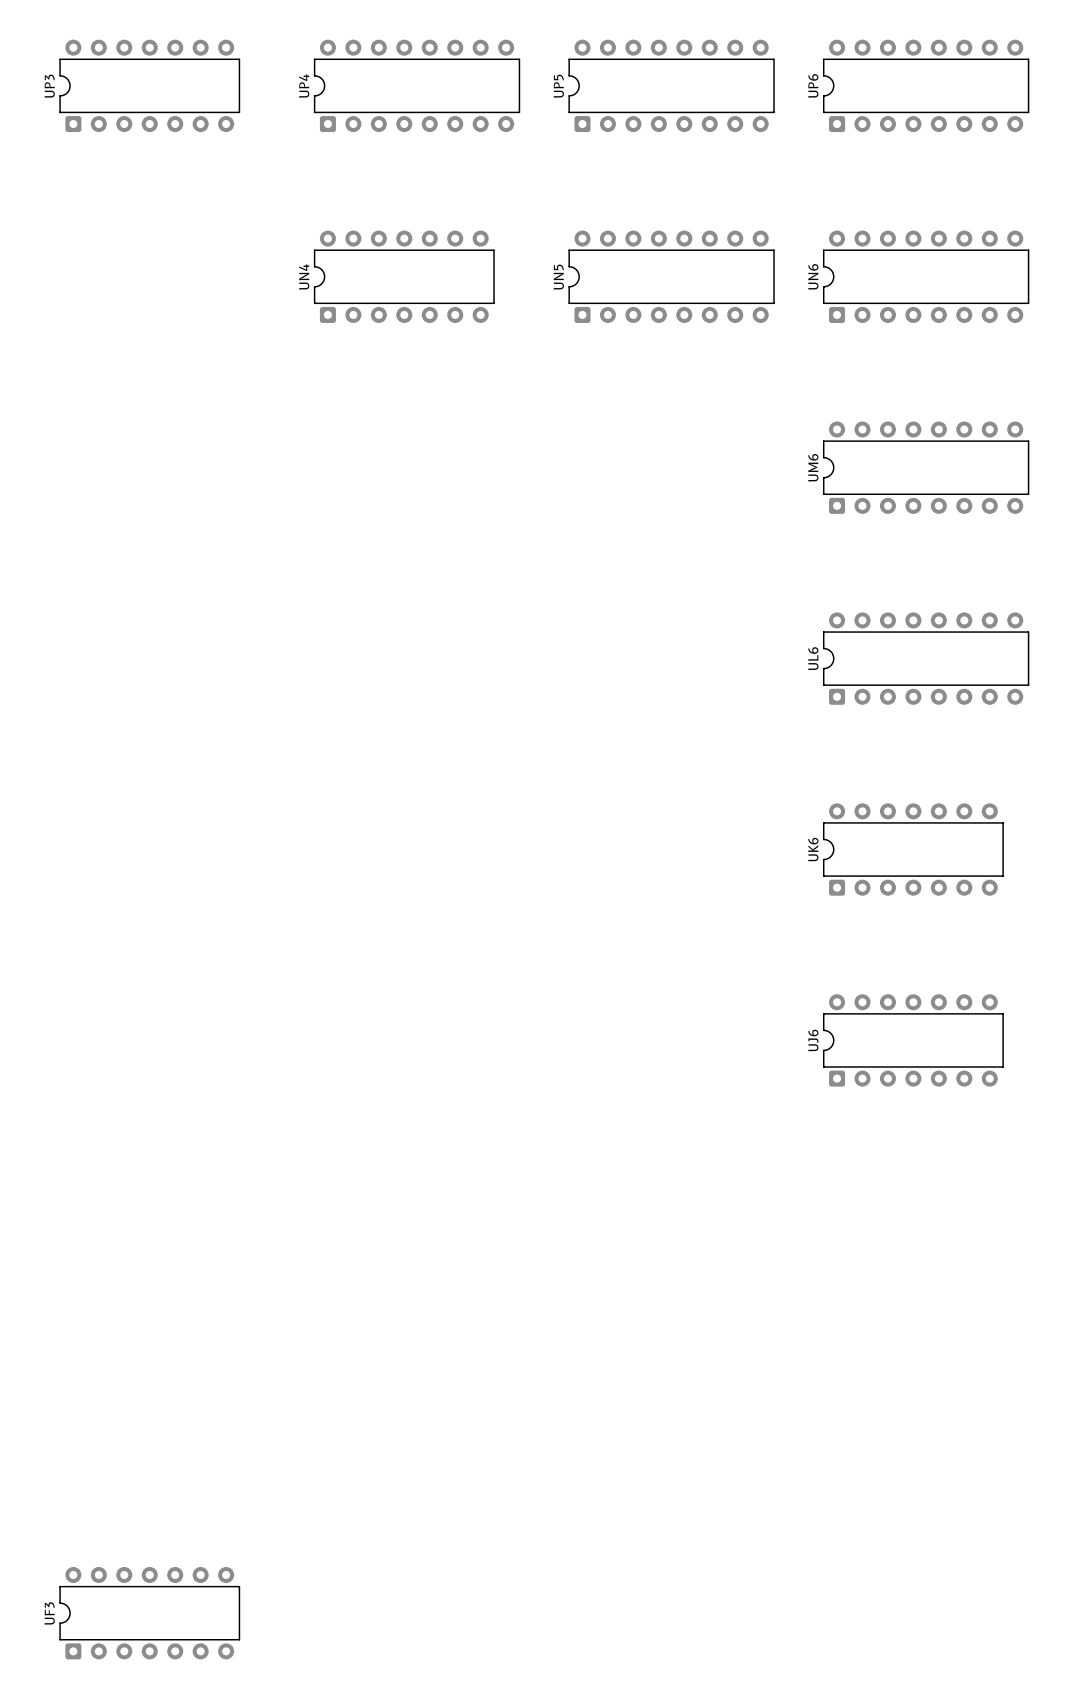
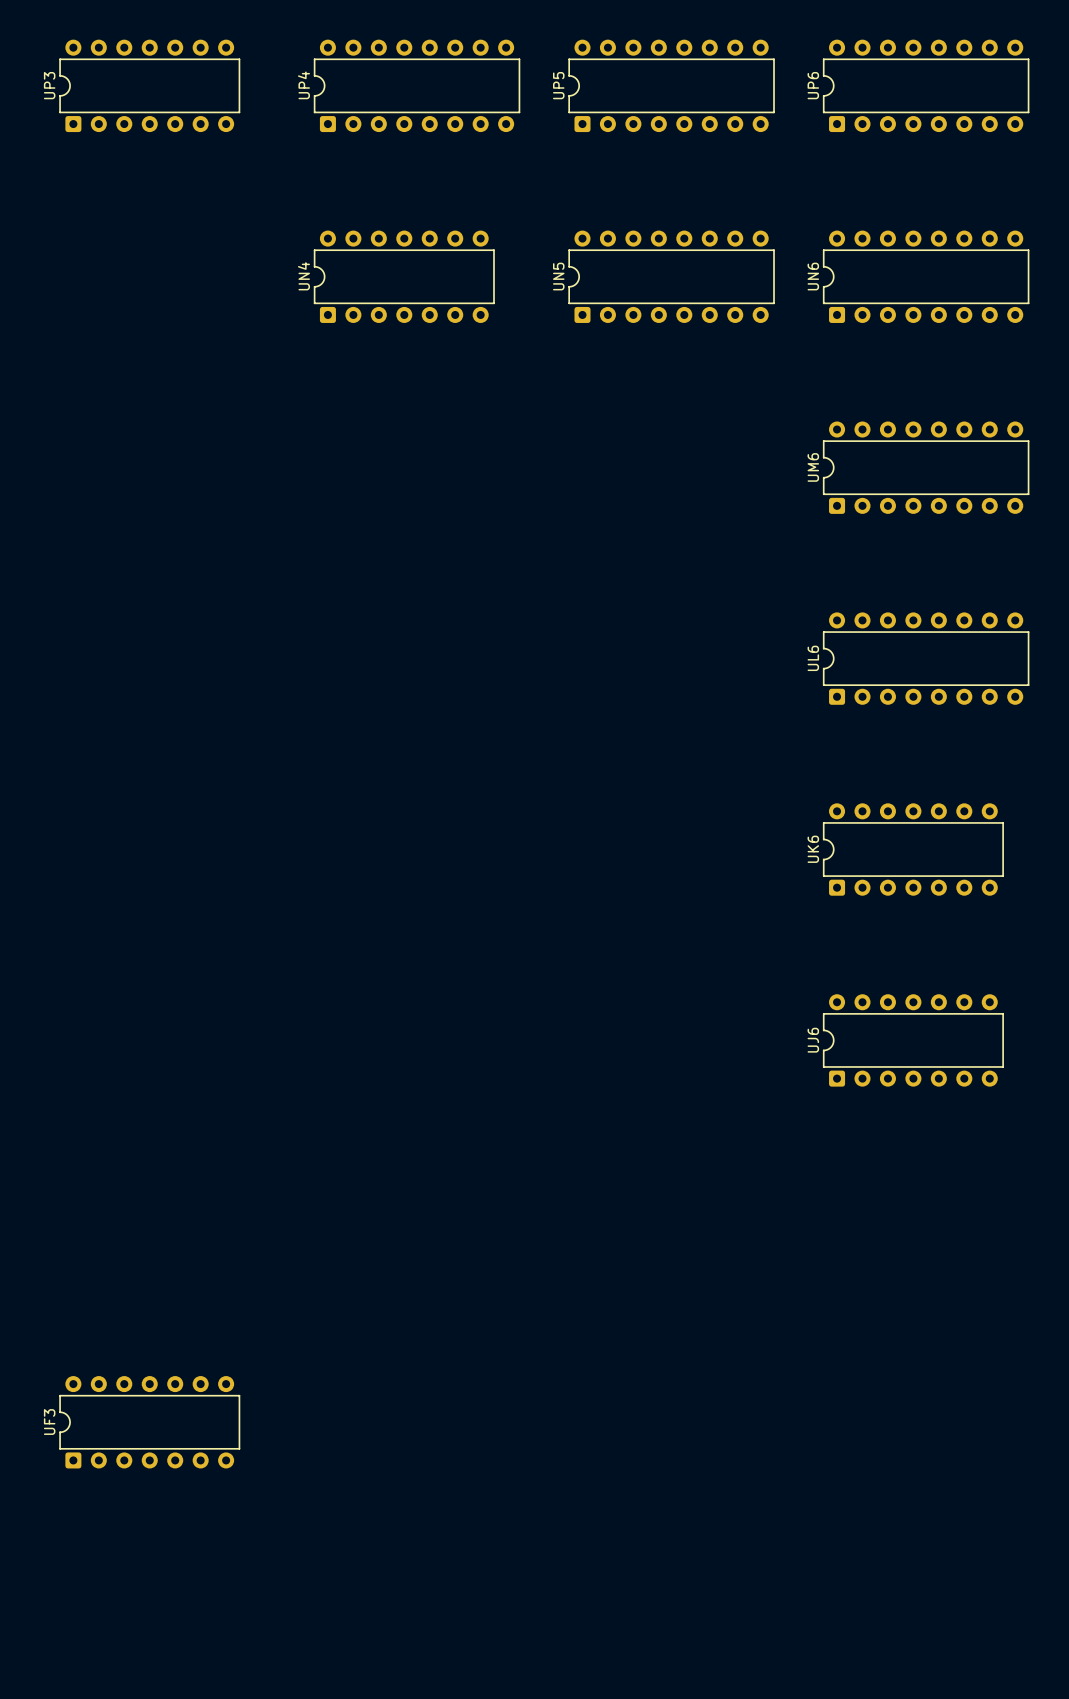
UF3 position: (149, 1613) -> (149, 1422)

